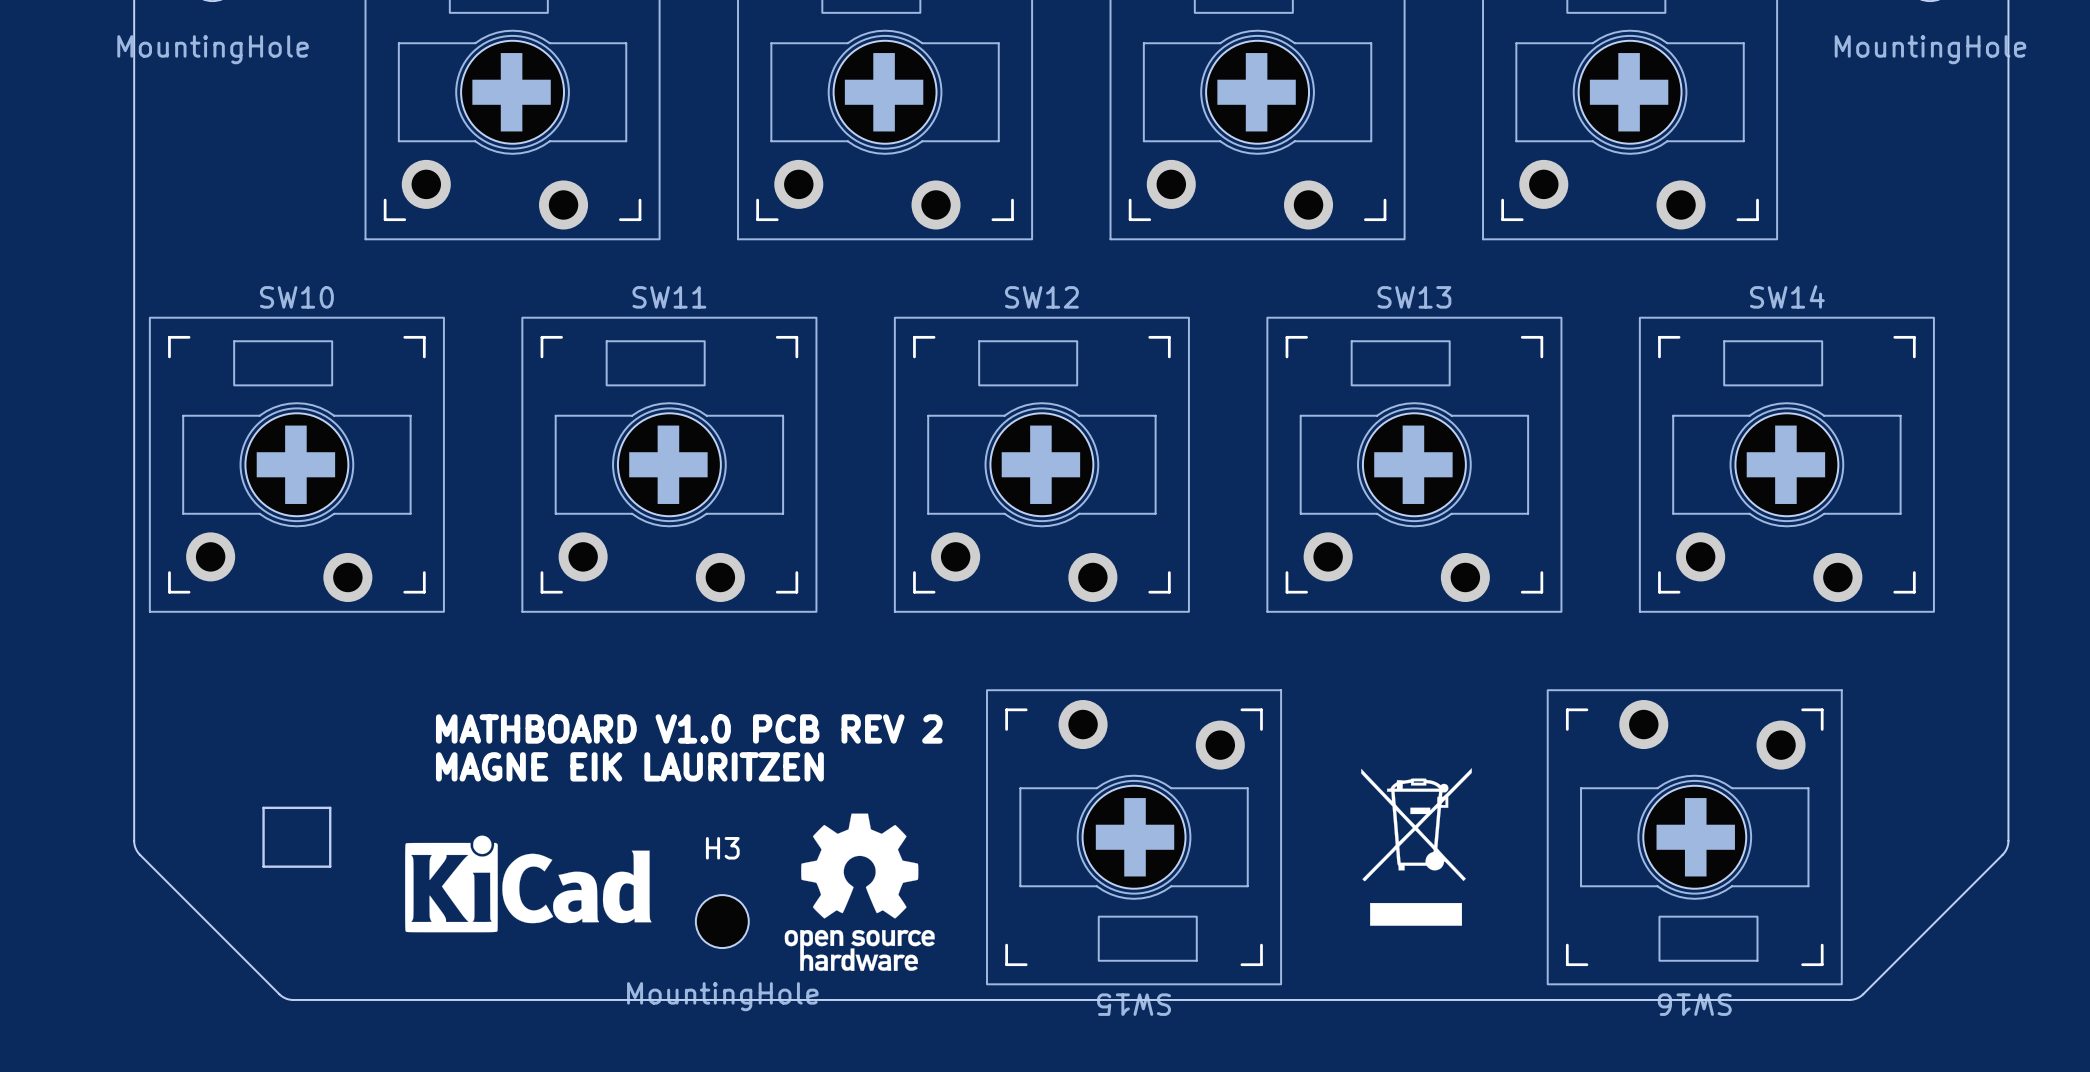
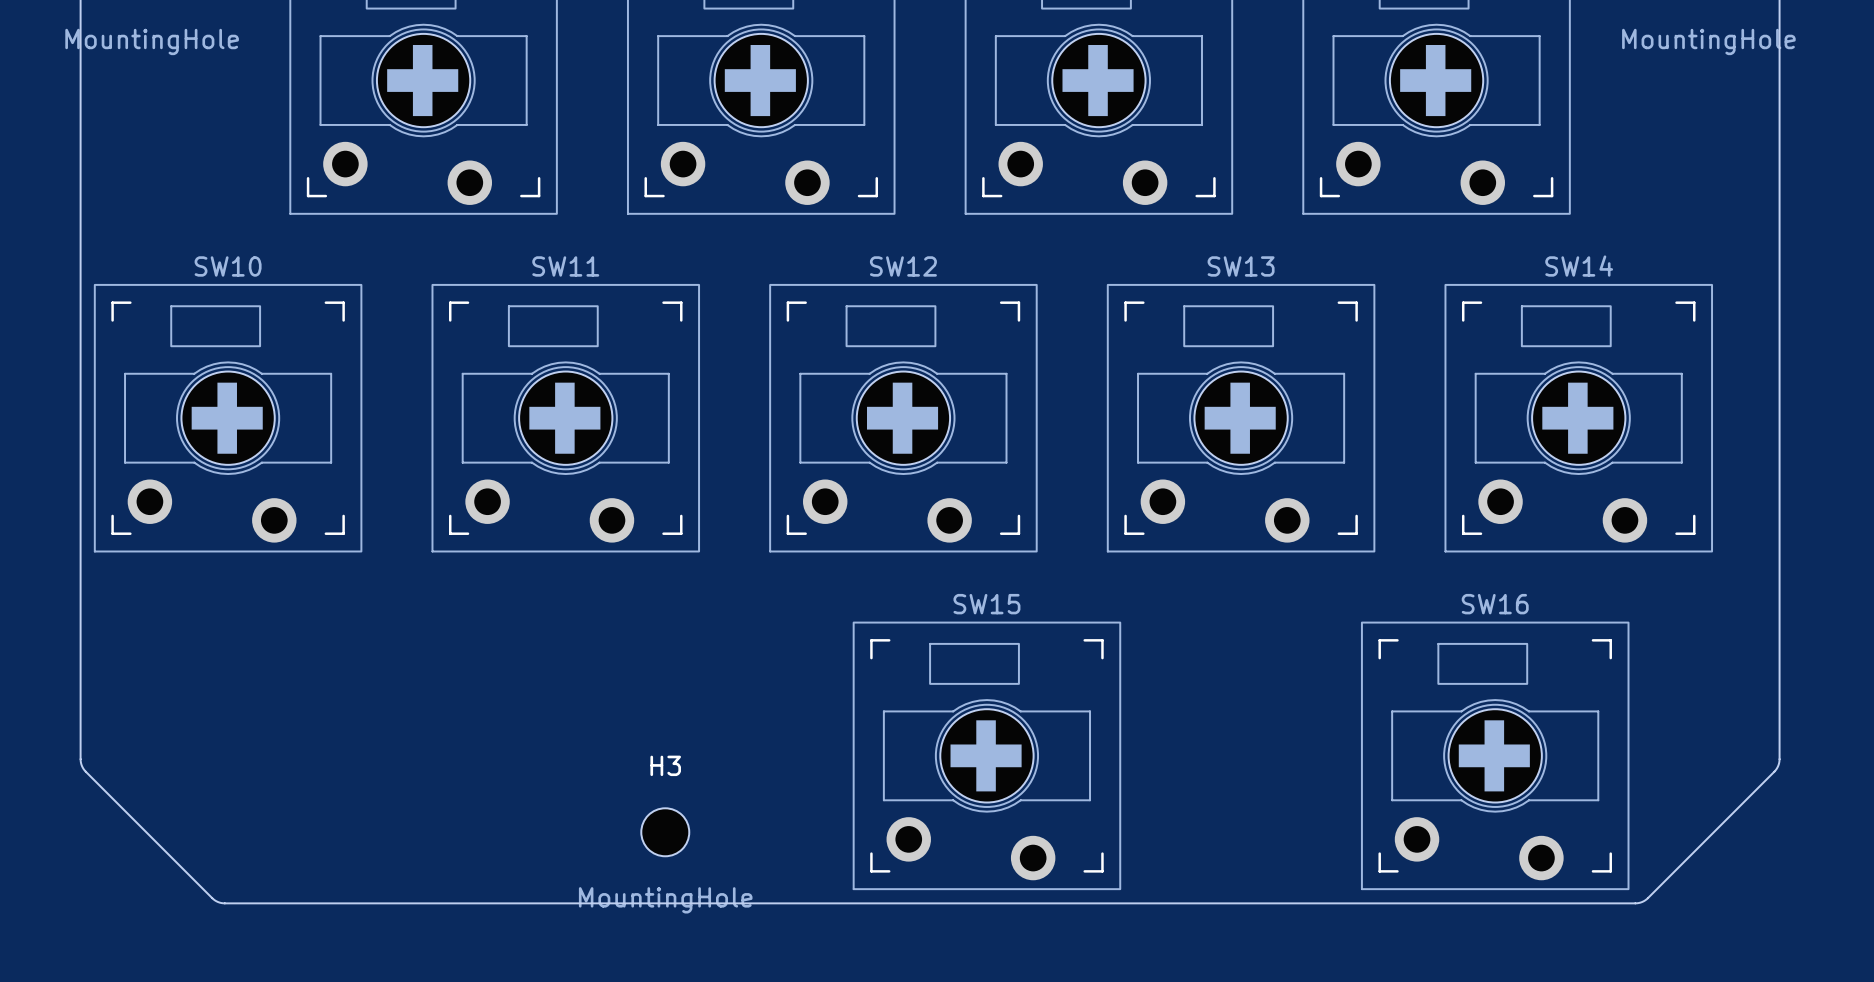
text: MATHBOARD V1.0 PCB REV 2 (689, 728) -> none
text: MAGNE EIK LAURITZEN (629, 766) -> none
drawing: [1361, 768, 1472, 926] -> none
drawing: [784, 813, 935, 971] -> none
drawing: [405, 835, 652, 933] -> none
part: (296, 837) -> none
SW15 rotation: 0° (1134, 837) -> 180° (986, 755)
SW16 rotation: 0° (1694, 837) -> 180° (1495, 755)
H3 position: (722, 921) -> (665, 832)

